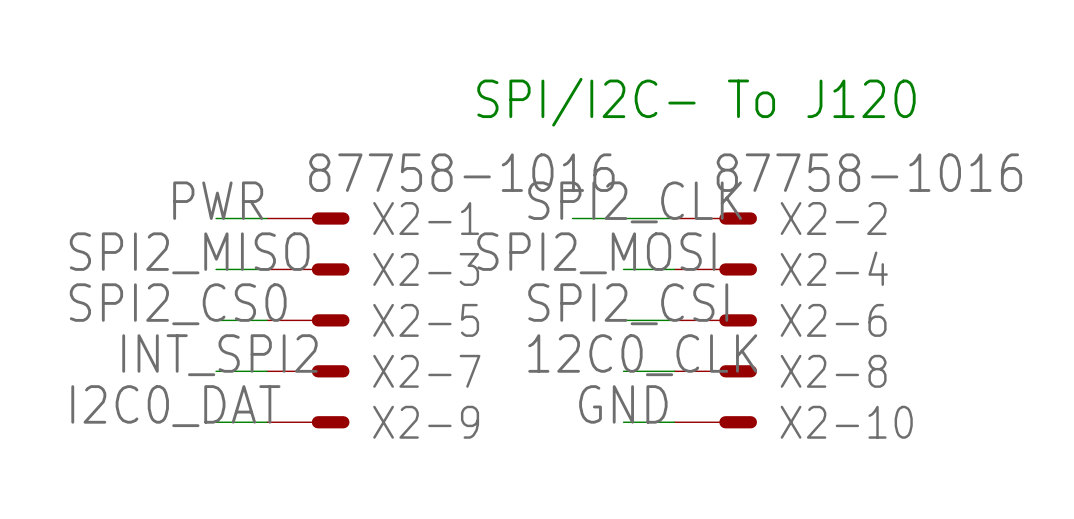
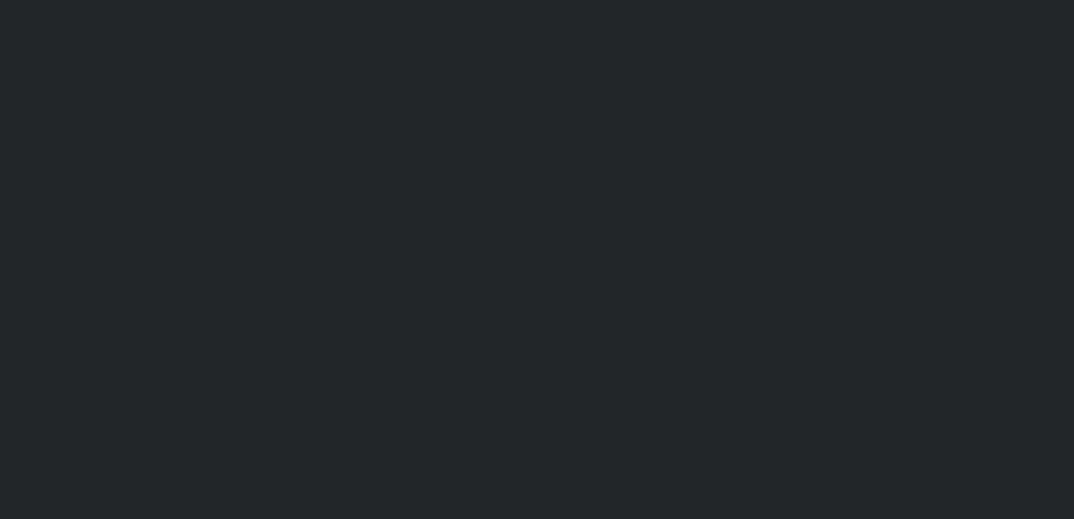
text: SPI/I2C- To J120 (696, 102) -> none
label: PWR (218, 200) -> none
label: SPI2_CLK (635, 202) -> none
wire: (216, 218) (266, 218) -> none
X2-1: 87758-1016 (308, 218) -> none
wire: (572, 218) (674, 218) -> none
X2-2: 87758-1016 (715, 218) -> none
label: SPI2_MISO (189, 253) -> none
label: SPI2_MOSI (596, 253) -> none
wire: (216, 269) (266, 269) -> none
X2-3: (308, 269) -> none
wire: (623, 269) (674, 269) -> none
X2-4: (715, 269) -> none
label: SPI2_CS0 (178, 304) -> none
label: SPI2_CSI (628, 304) -> none
wire: (216, 320) (266, 320) -> none
X2-5: (308, 320) -> none
wire: (623, 320) (674, 320) -> none
X2-6: (715, 320) -> none
label: INT_SPI2 (219, 355) -> none
label: 12C0_CLK (642, 355) -> none
wire: (216, 371) (266, 371) -> none
X2-7: (308, 371) -> none
wire: (623, 371) (674, 371) -> none
X2-8: (715, 371) -> none
label: GND (623, 404) -> none
label: I2C0_DAT (175, 406) -> none
wire: (216, 422) (266, 422) -> none
X2-9: (308, 422) -> none
wire: (623, 422) (674, 422) -> none
X2-10: (715, 422) -> none

